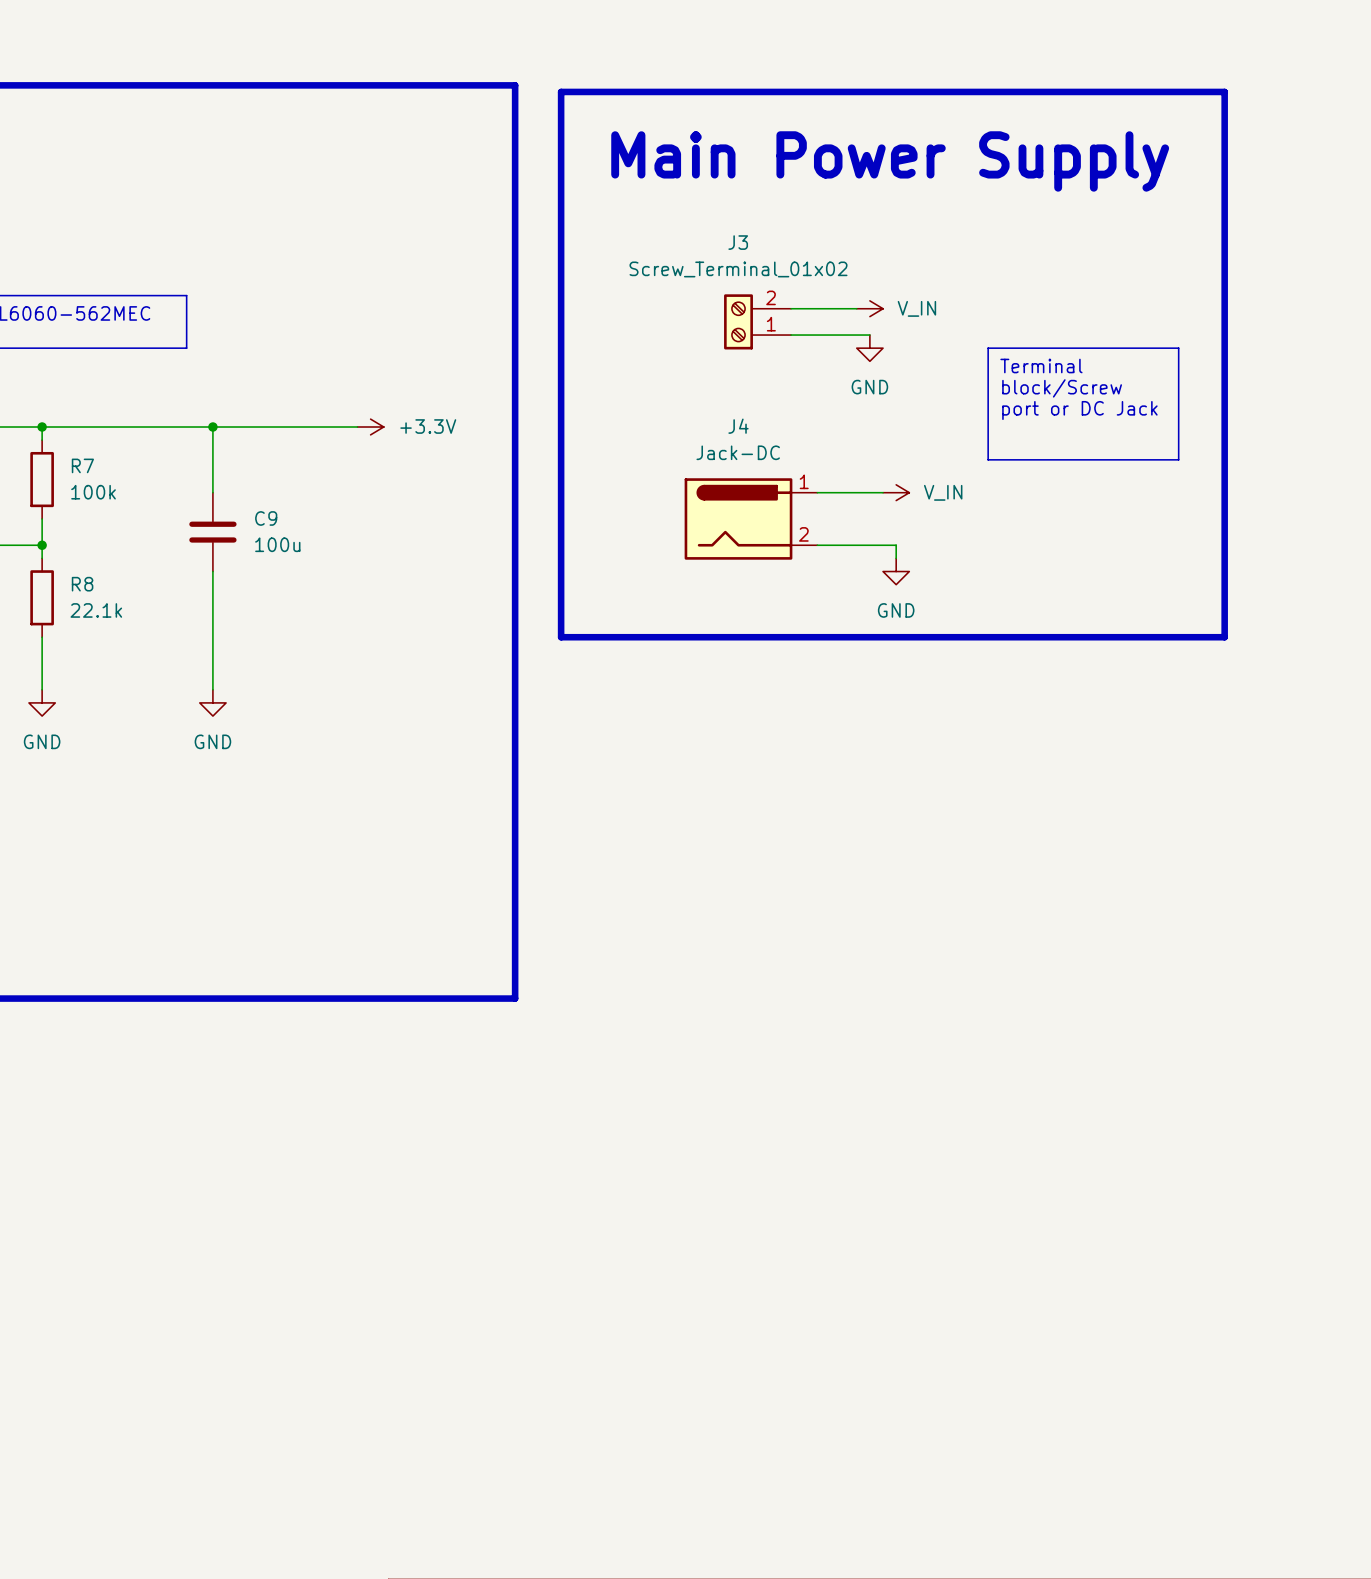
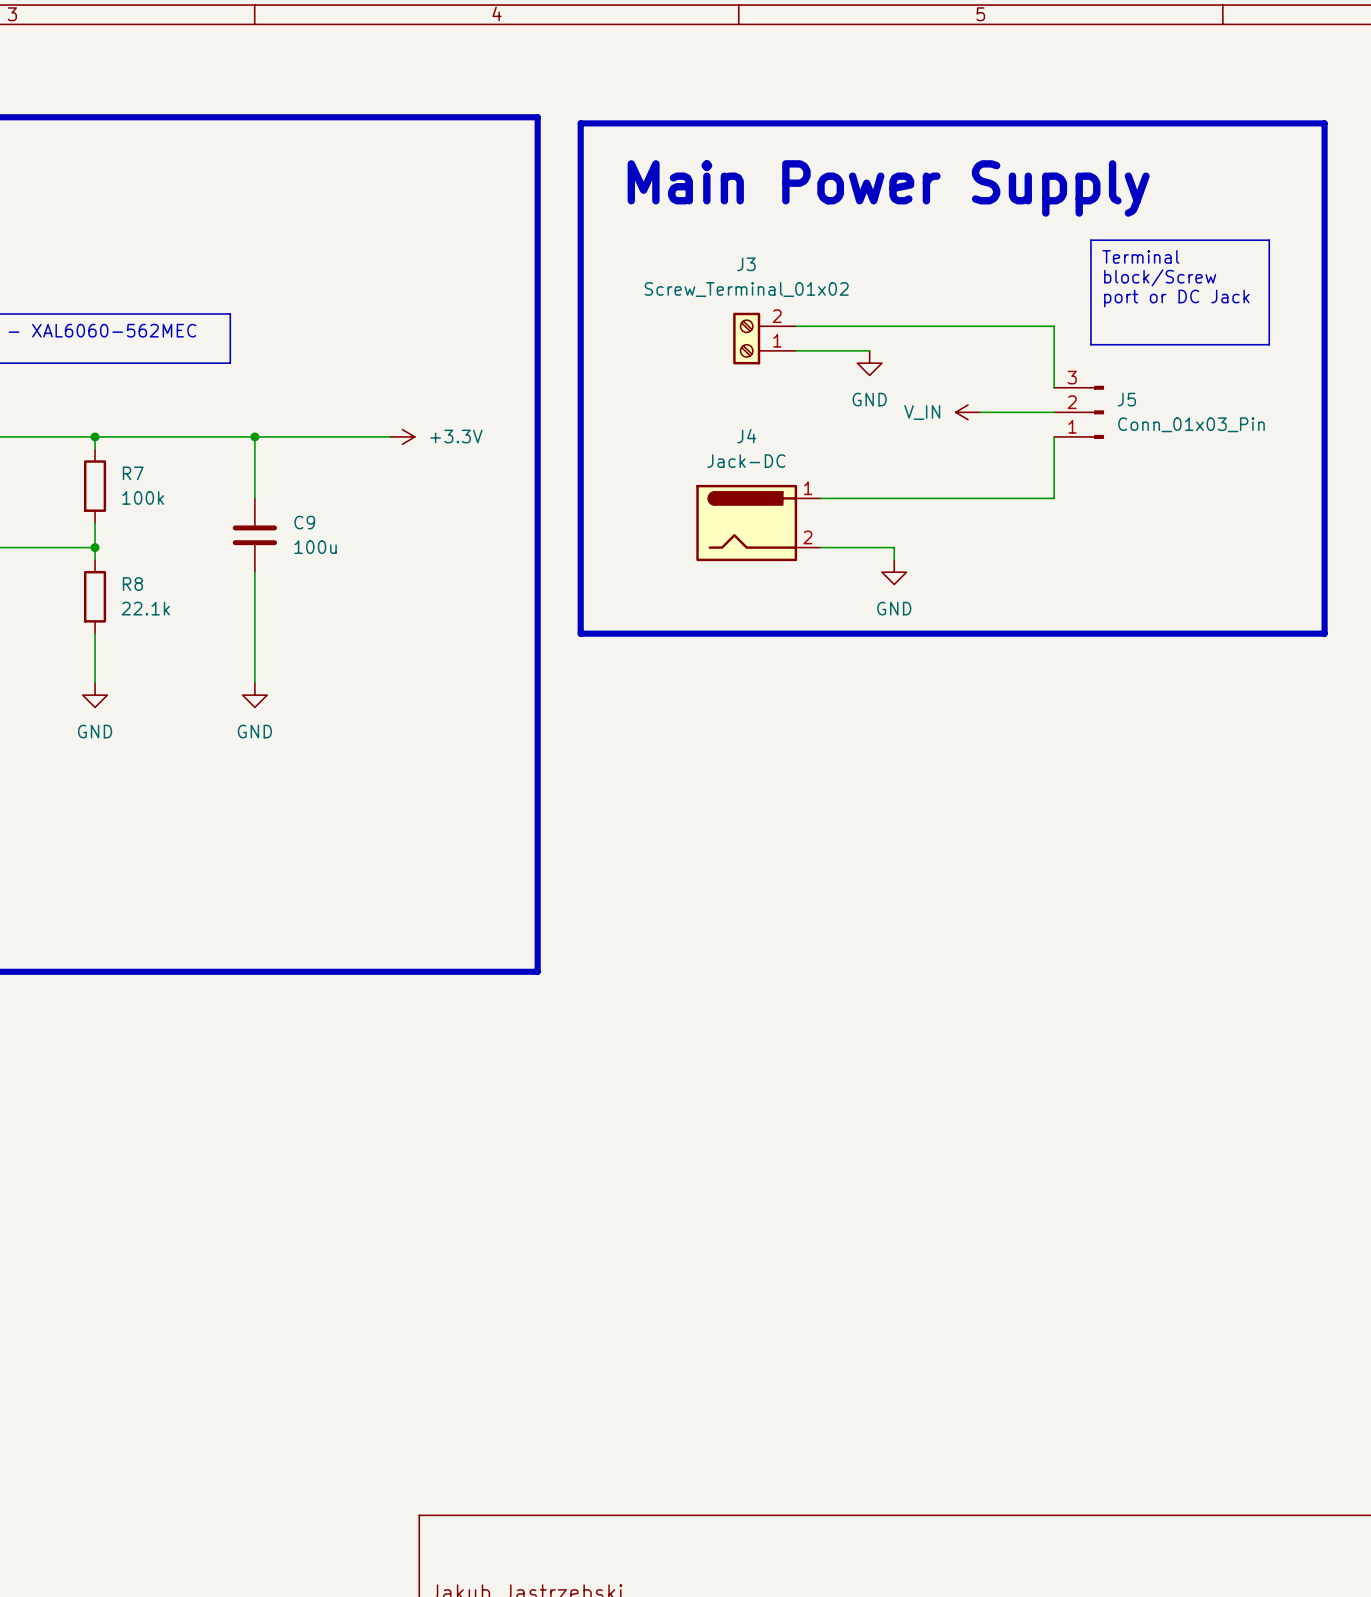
line: (1224, 91) (1224, 637) -> (1201, 123) (1324, 123) (1324, 633) (1201, 633)
wire: none -> (857, 326) (1054, 326) (1054, 387)
power symbol: V_IN (869, 308) -> none
line: (988, 348) (1178, 348) (1178, 459) (988, 459) (988, 348) -> (1090, 240) (1269, 240) (1269, 344) (1090, 344) (1090, 240)
text position: Terminal (1041, 366) -> Terminal (1140, 256)
text position: block/Screw (1062, 388) -> block/Screw (1160, 277)
power symbol: none -> V_IN (968, 412)
wire: none -> (980, 412) (1054, 412)
J5: none -> Conn_01x03_Pin (1079, 412)
text position: port or DC Jack (1079, 410) -> port or DC Jack (1176, 298)
wire: none -> (1054, 436) (1054, 498) (881, 498)
power symbol: V_IN (896, 492) -> none

